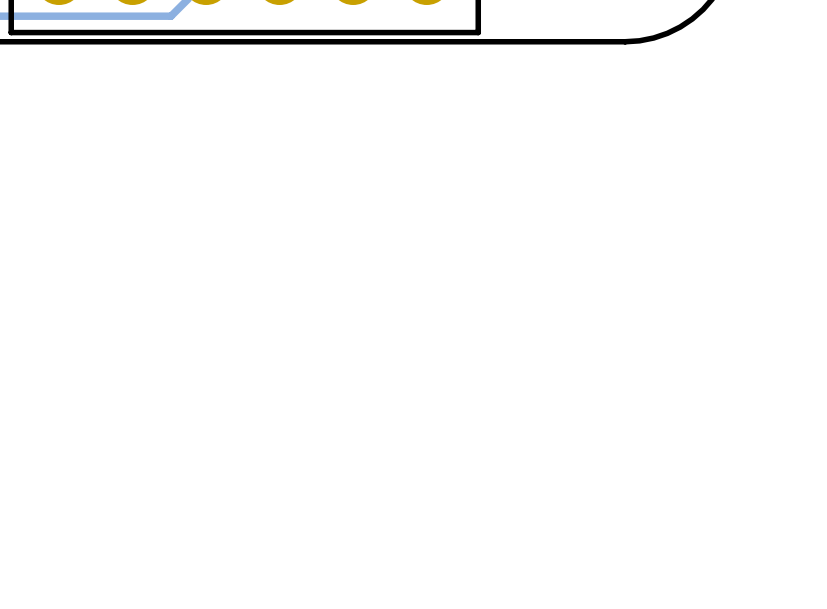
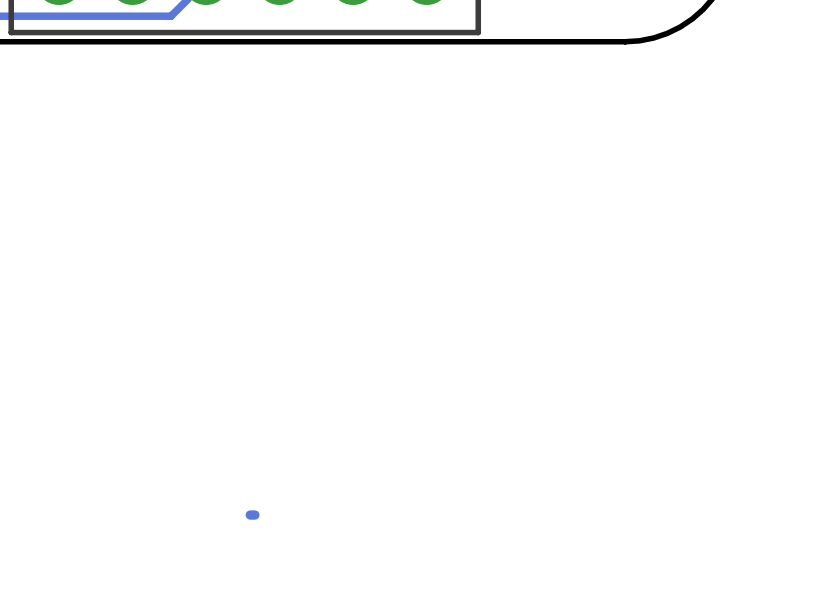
bottom track: none -> (250, 515) (254, 515)

